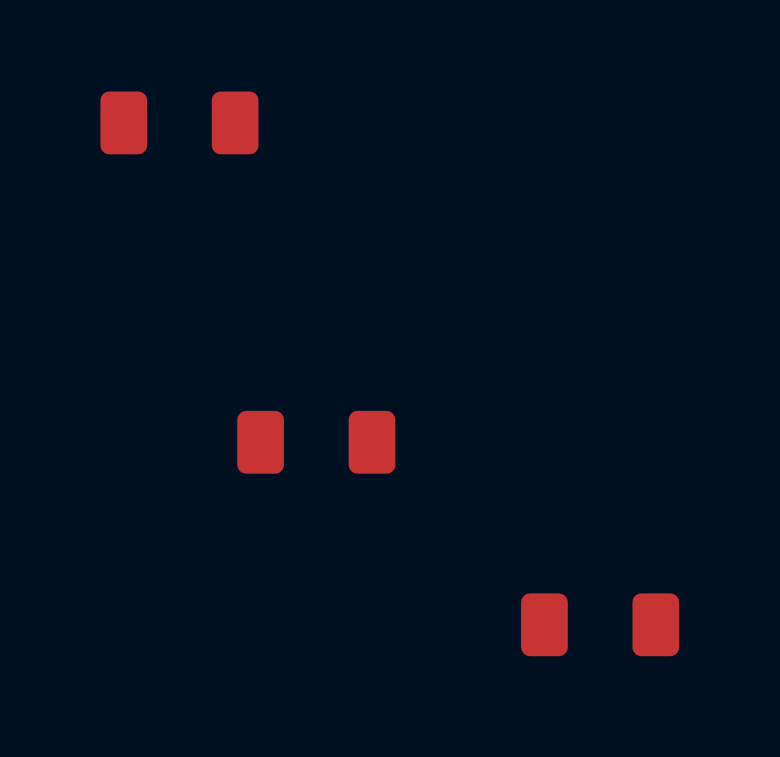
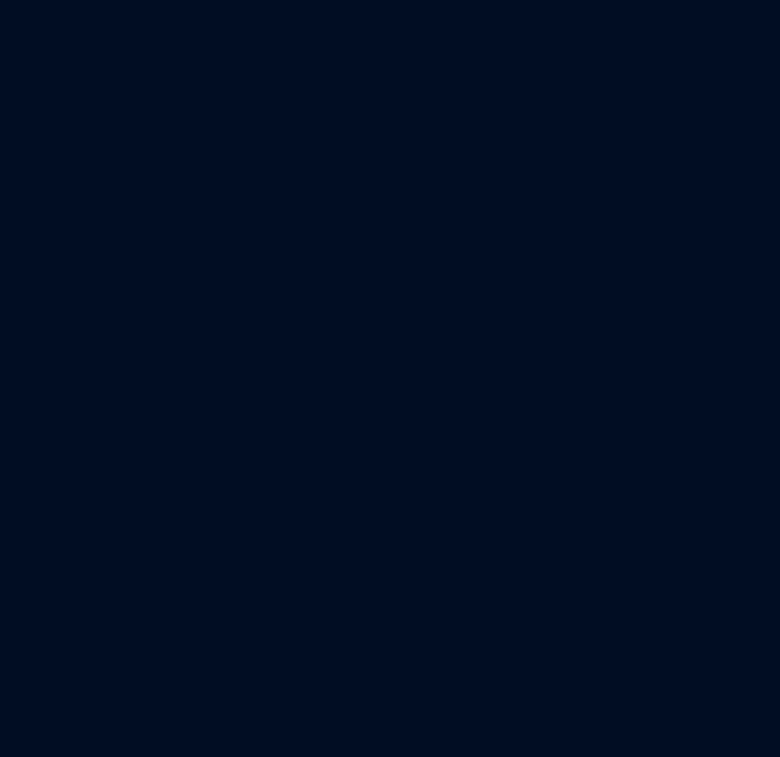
part: (179, 122) -> none
part: (316, 442) -> none
part: (600, 624) -> none

